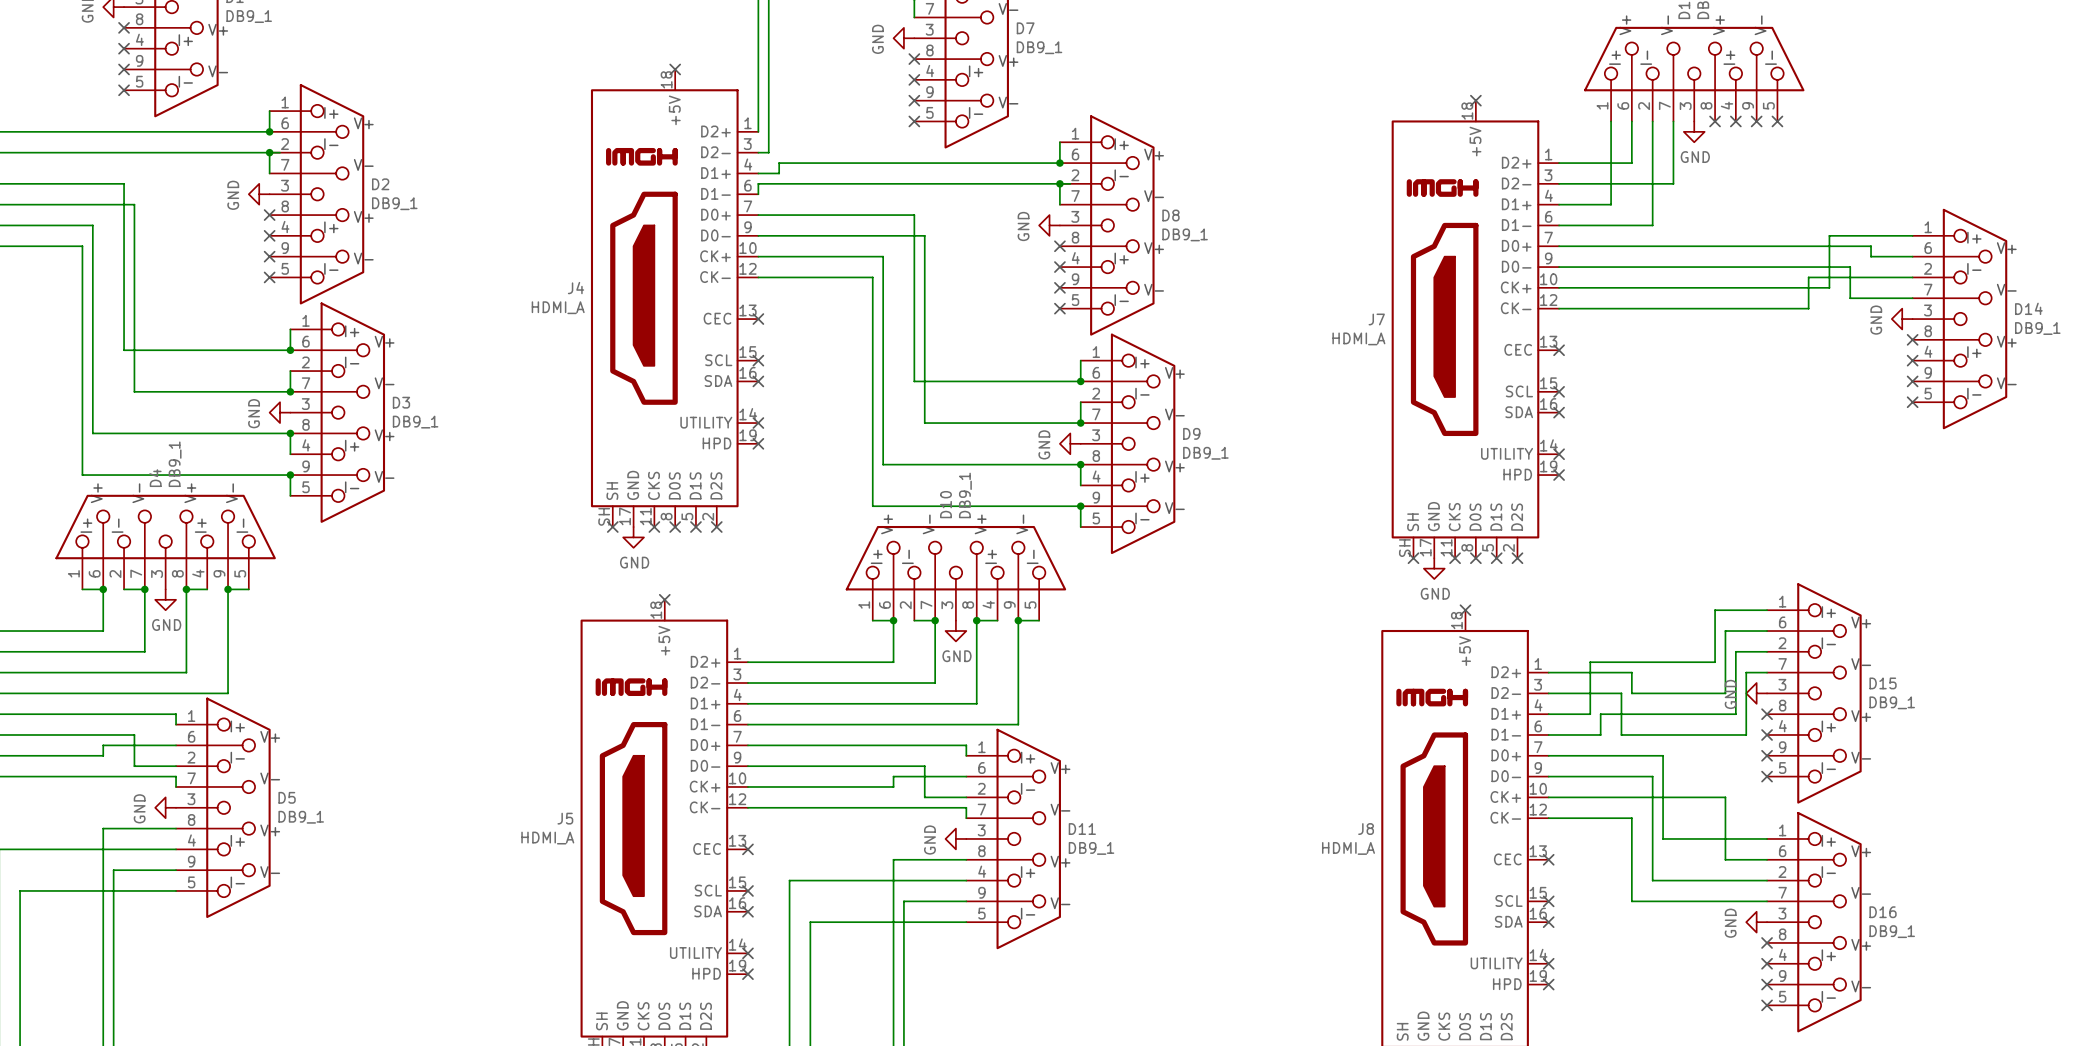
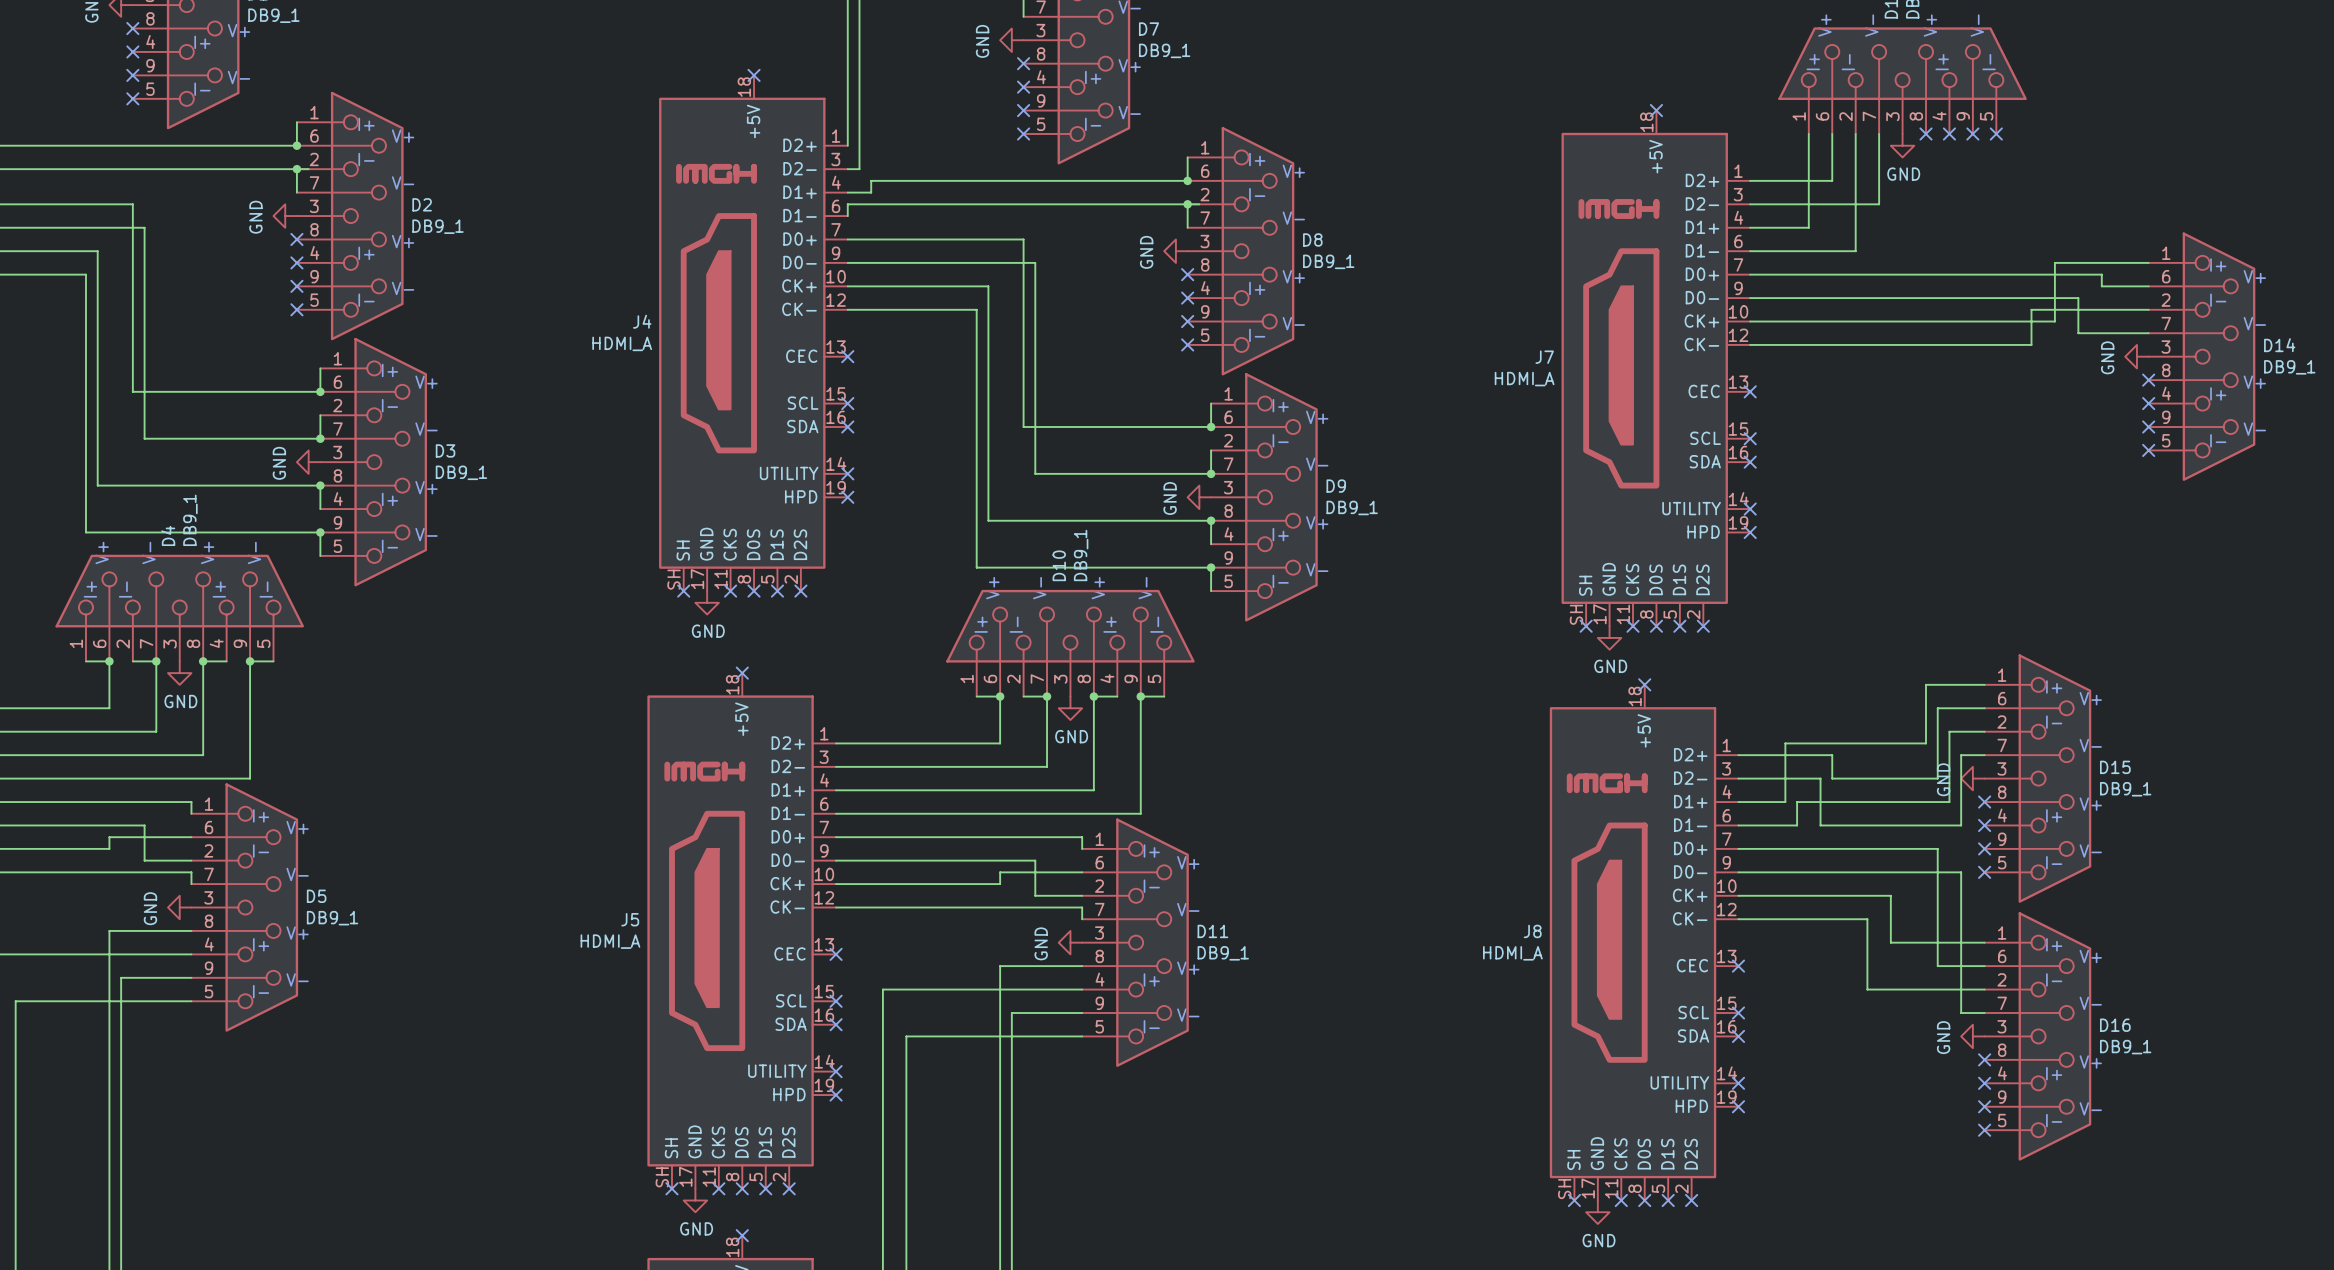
wire: (1663, 755) (1663, 818) -> (1832, 919) (1867, 919)
wire: (1652, 776) (1652, 880) (1663, 880) -> (1867, 942) (1867, 989)
wire: (1683, 797) (1725, 797) -> (1867, 848) (1937, 848) (1937, 895)
wire: (1631, 818) (1631, 901) (1746, 901) -> (1855, 872) (1961, 872) (1961, 1012)
wire: (1663, 838) (1683, 838) -> (1890, 895) (1890, 942)

